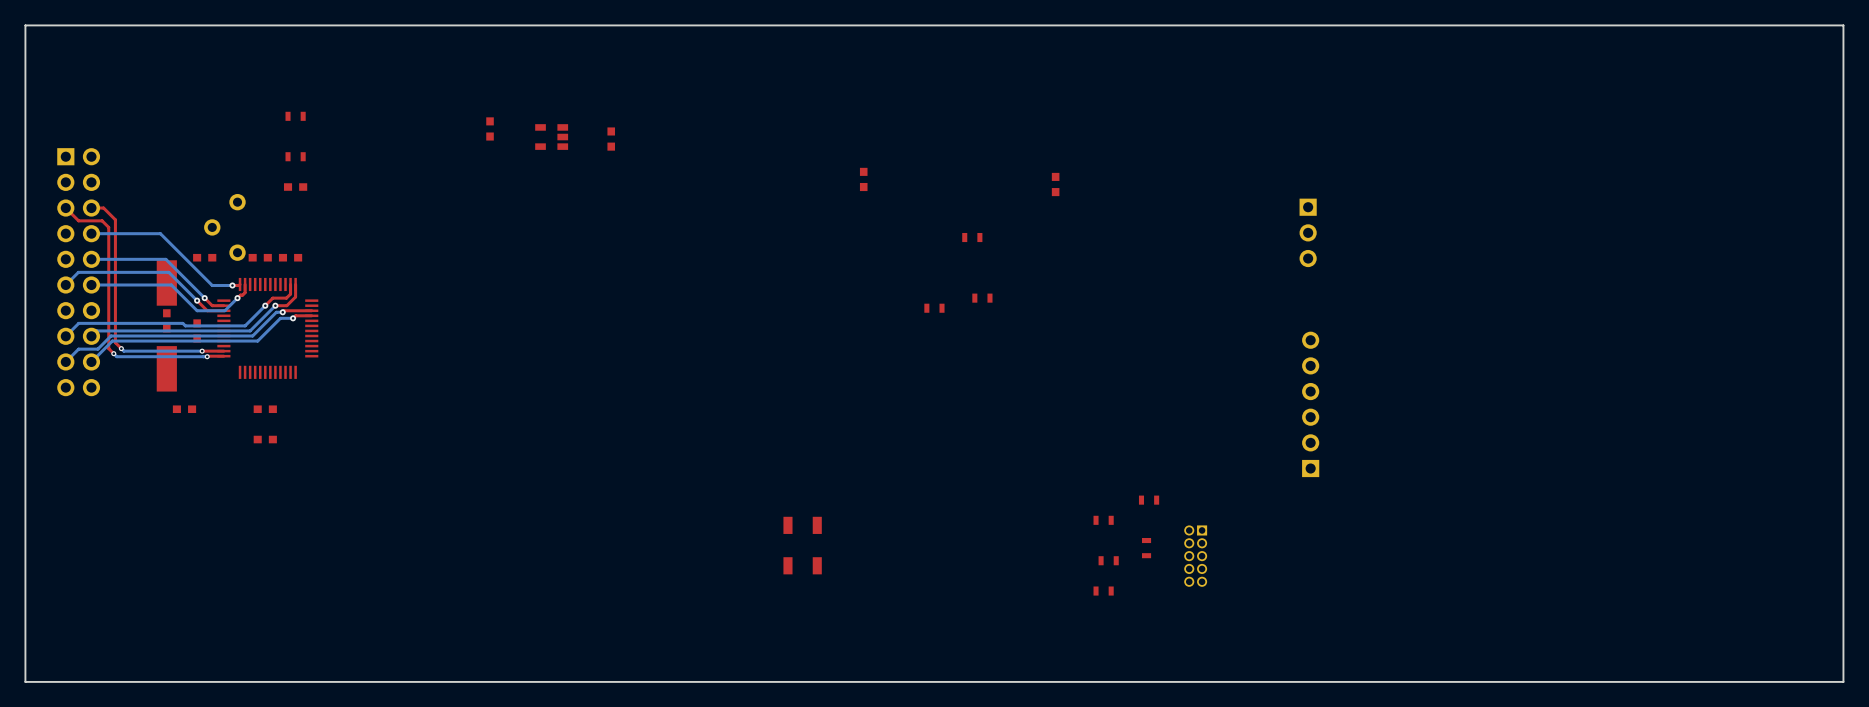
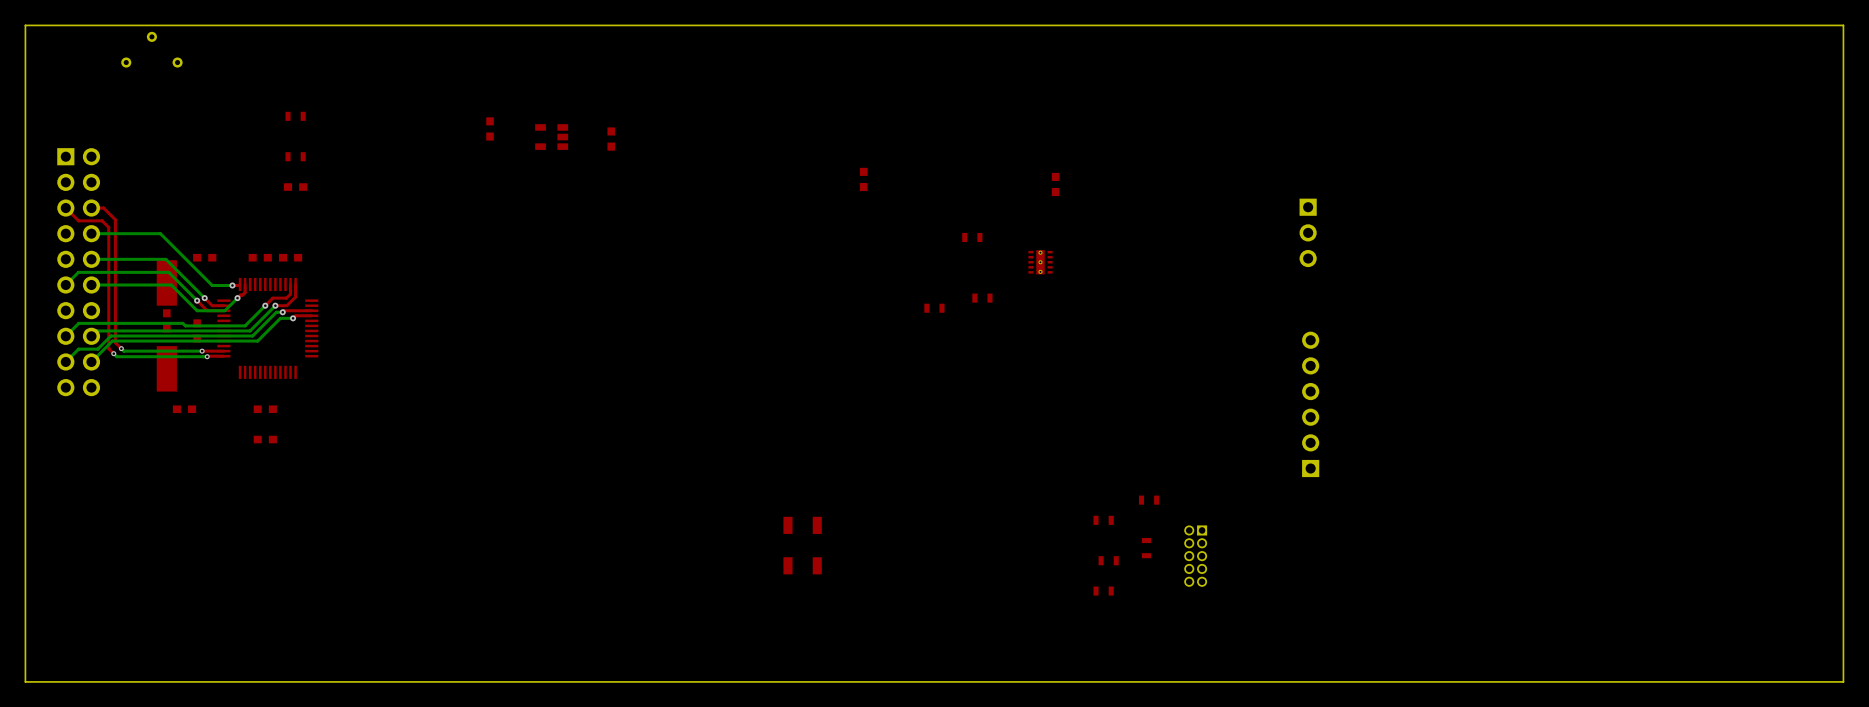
part: none -> (151, 49)
part: (224, 227) -> none
part: none -> (1040, 262)

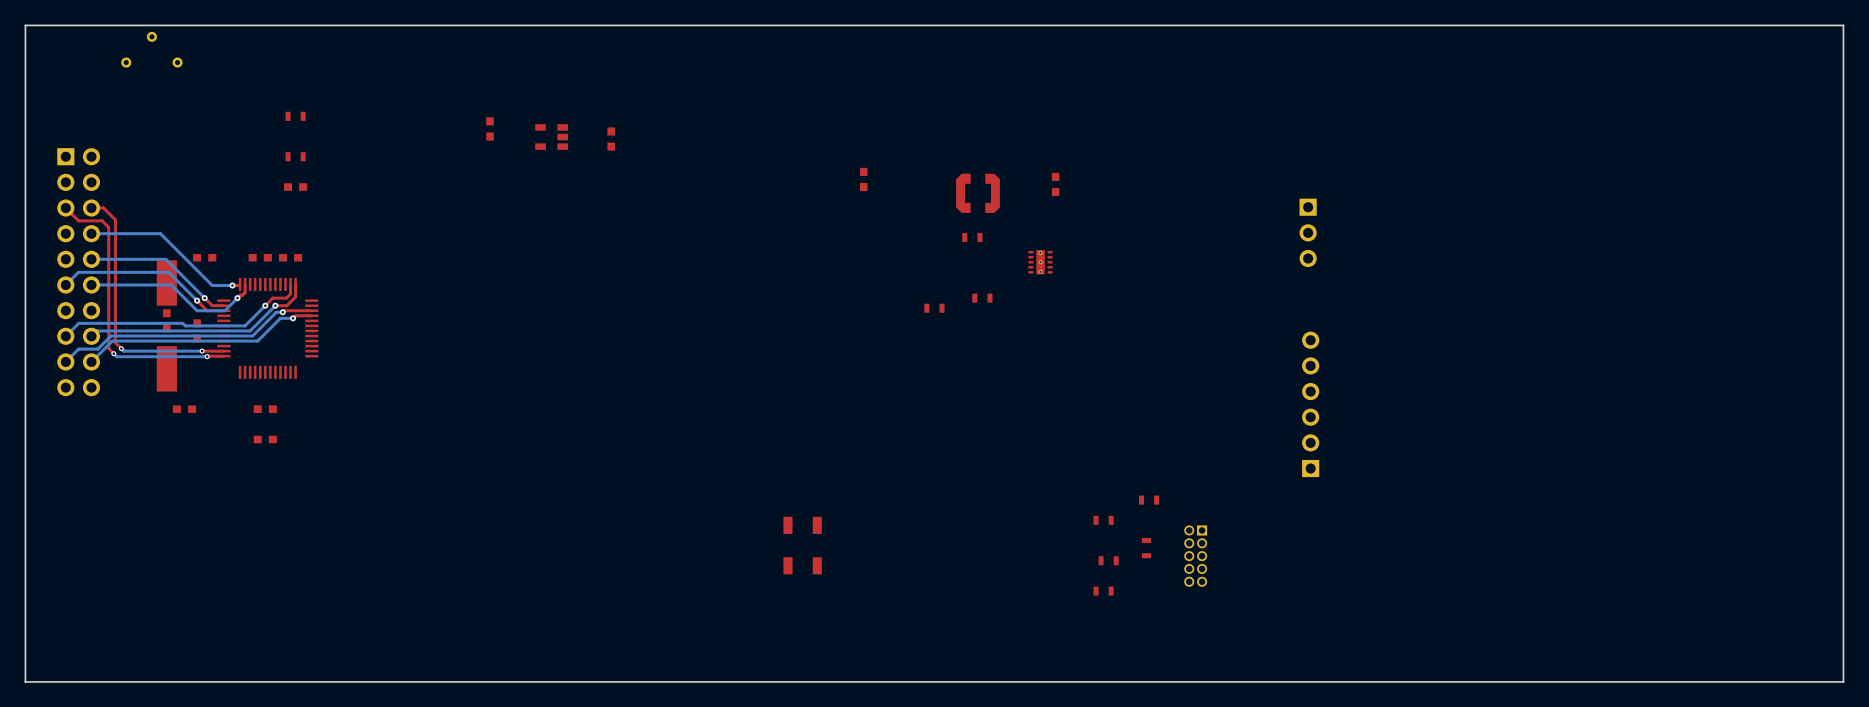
part: none -> (977, 193)

